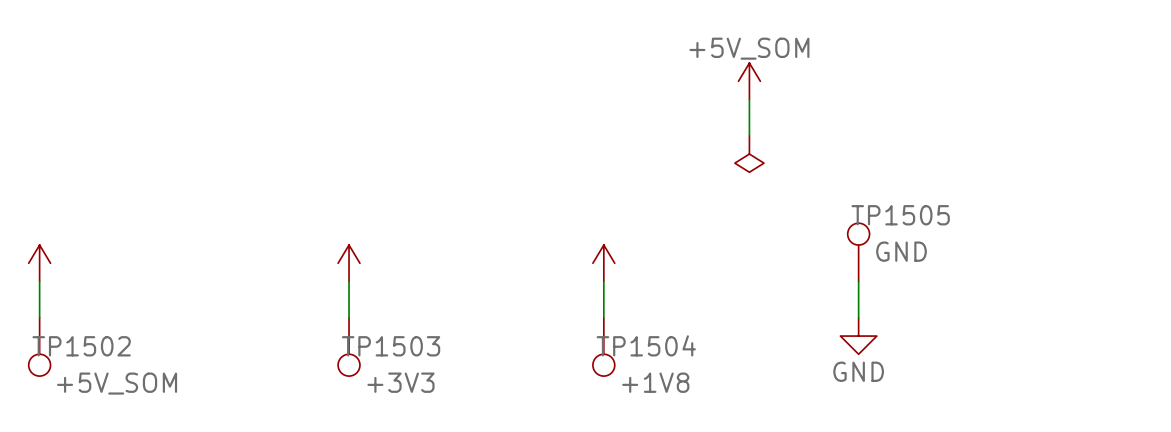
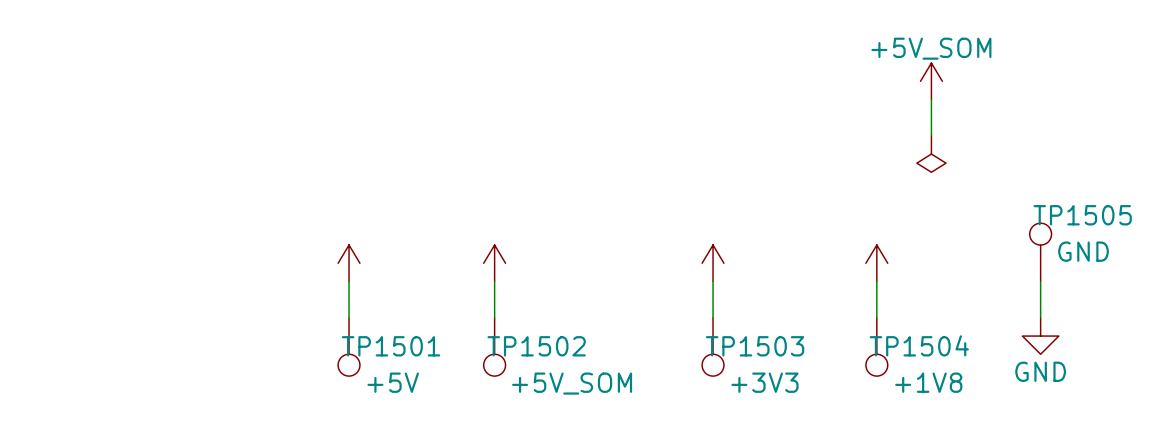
power symbol position: +5V_SOM (749, 81) -> +5V_SOM (931, 81)
wire: (749, 99) (749, 135) -> (931, 99) (931, 135)
power symbol position: (749, 154) -> (931, 154)
TP1505 position: (858, 252) -> (1040, 252)
power symbol: (39, 263) -> none
power symbol: none -> (494, 263)
power symbol: (603, 263) -> none
power symbol: none -> (713, 263)
power symbol: none -> (876, 263)
wire: (39, 281) (39, 317) -> none
wire: (603, 281) (603, 317) -> (494, 281) (494, 317)
wire: none -> (713, 281) (713, 317)
wire: (858, 281) (858, 317) -> (1040, 281) (1040, 317)
wire: none -> (876, 281) (876, 317)
power symbol position: GND (858, 336) -> GND (1040, 336)
TP1502 position: (39, 346) -> (494, 346)
TP1503 name: TP1503 (391, 346) -> TP1501 (391, 346)
TP1504 position: (603, 346) -> (876, 346)
TP1503: none -> +3V3 (713, 346)
TP1503 value: +3V3 (400, 382) -> +5V (393, 382)

